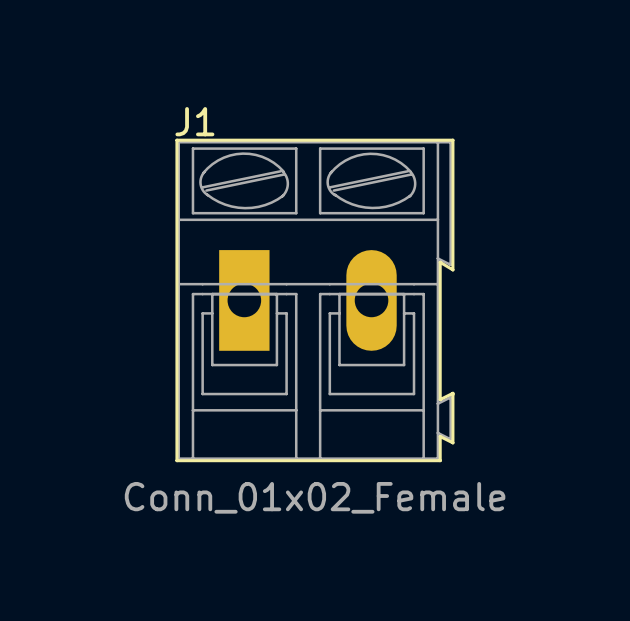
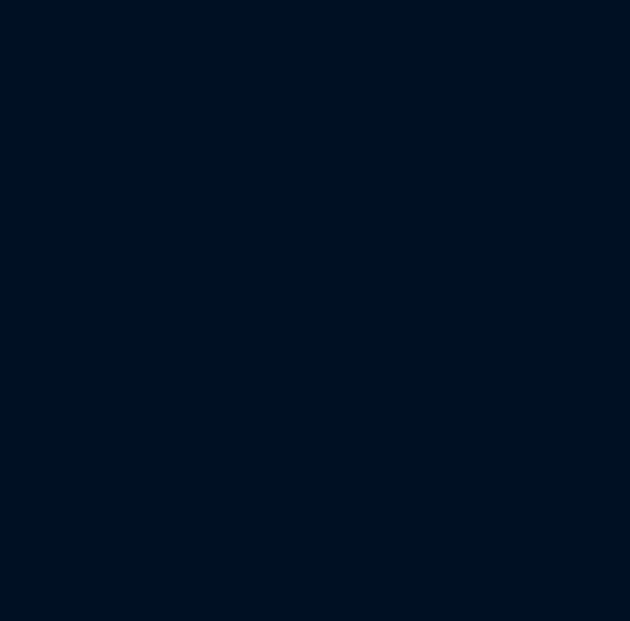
J1: Conn_01x02_Female (314, 300) -> none

